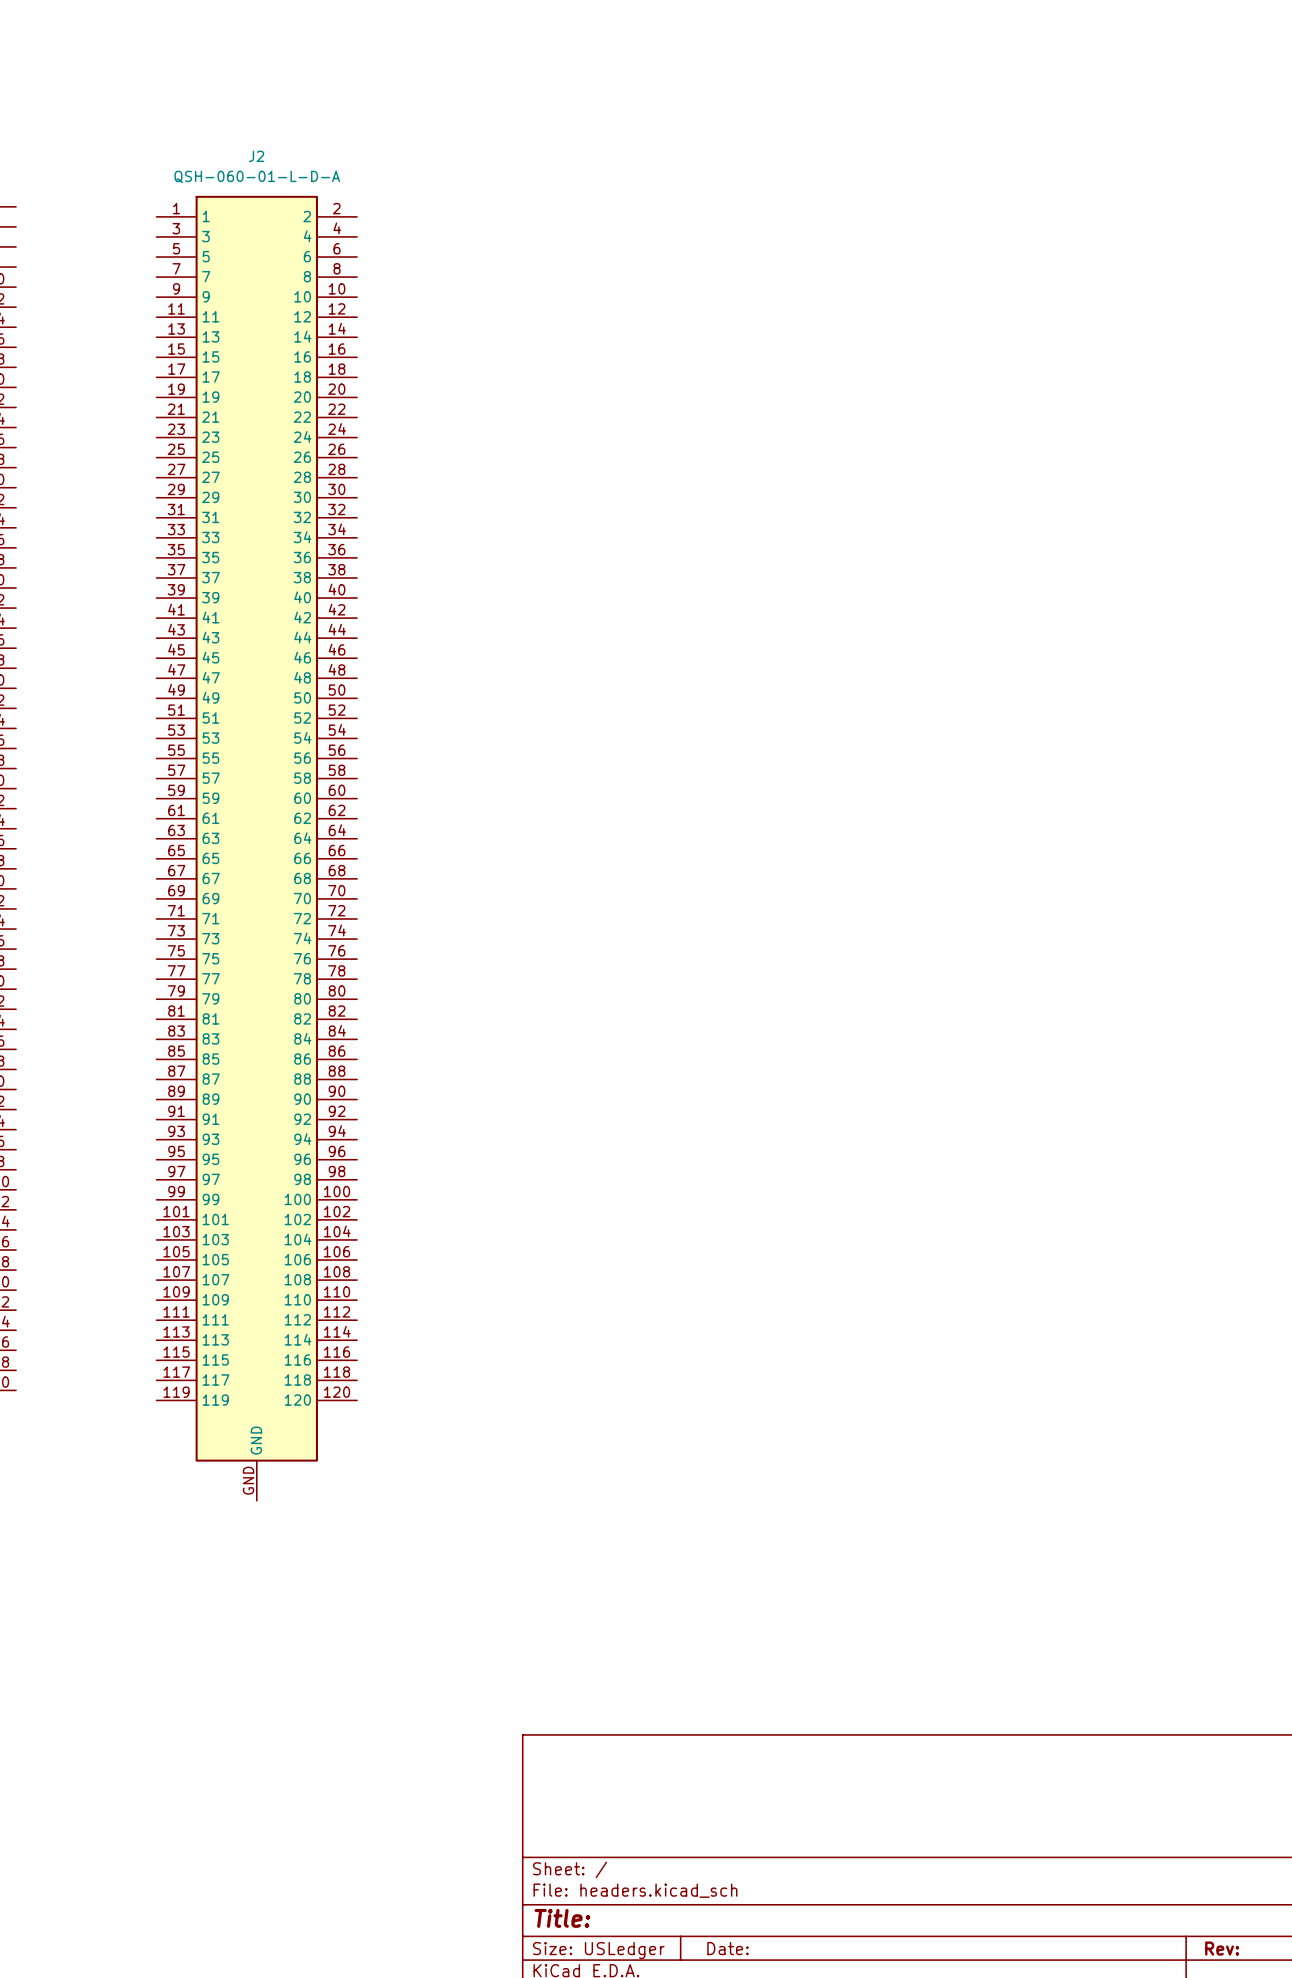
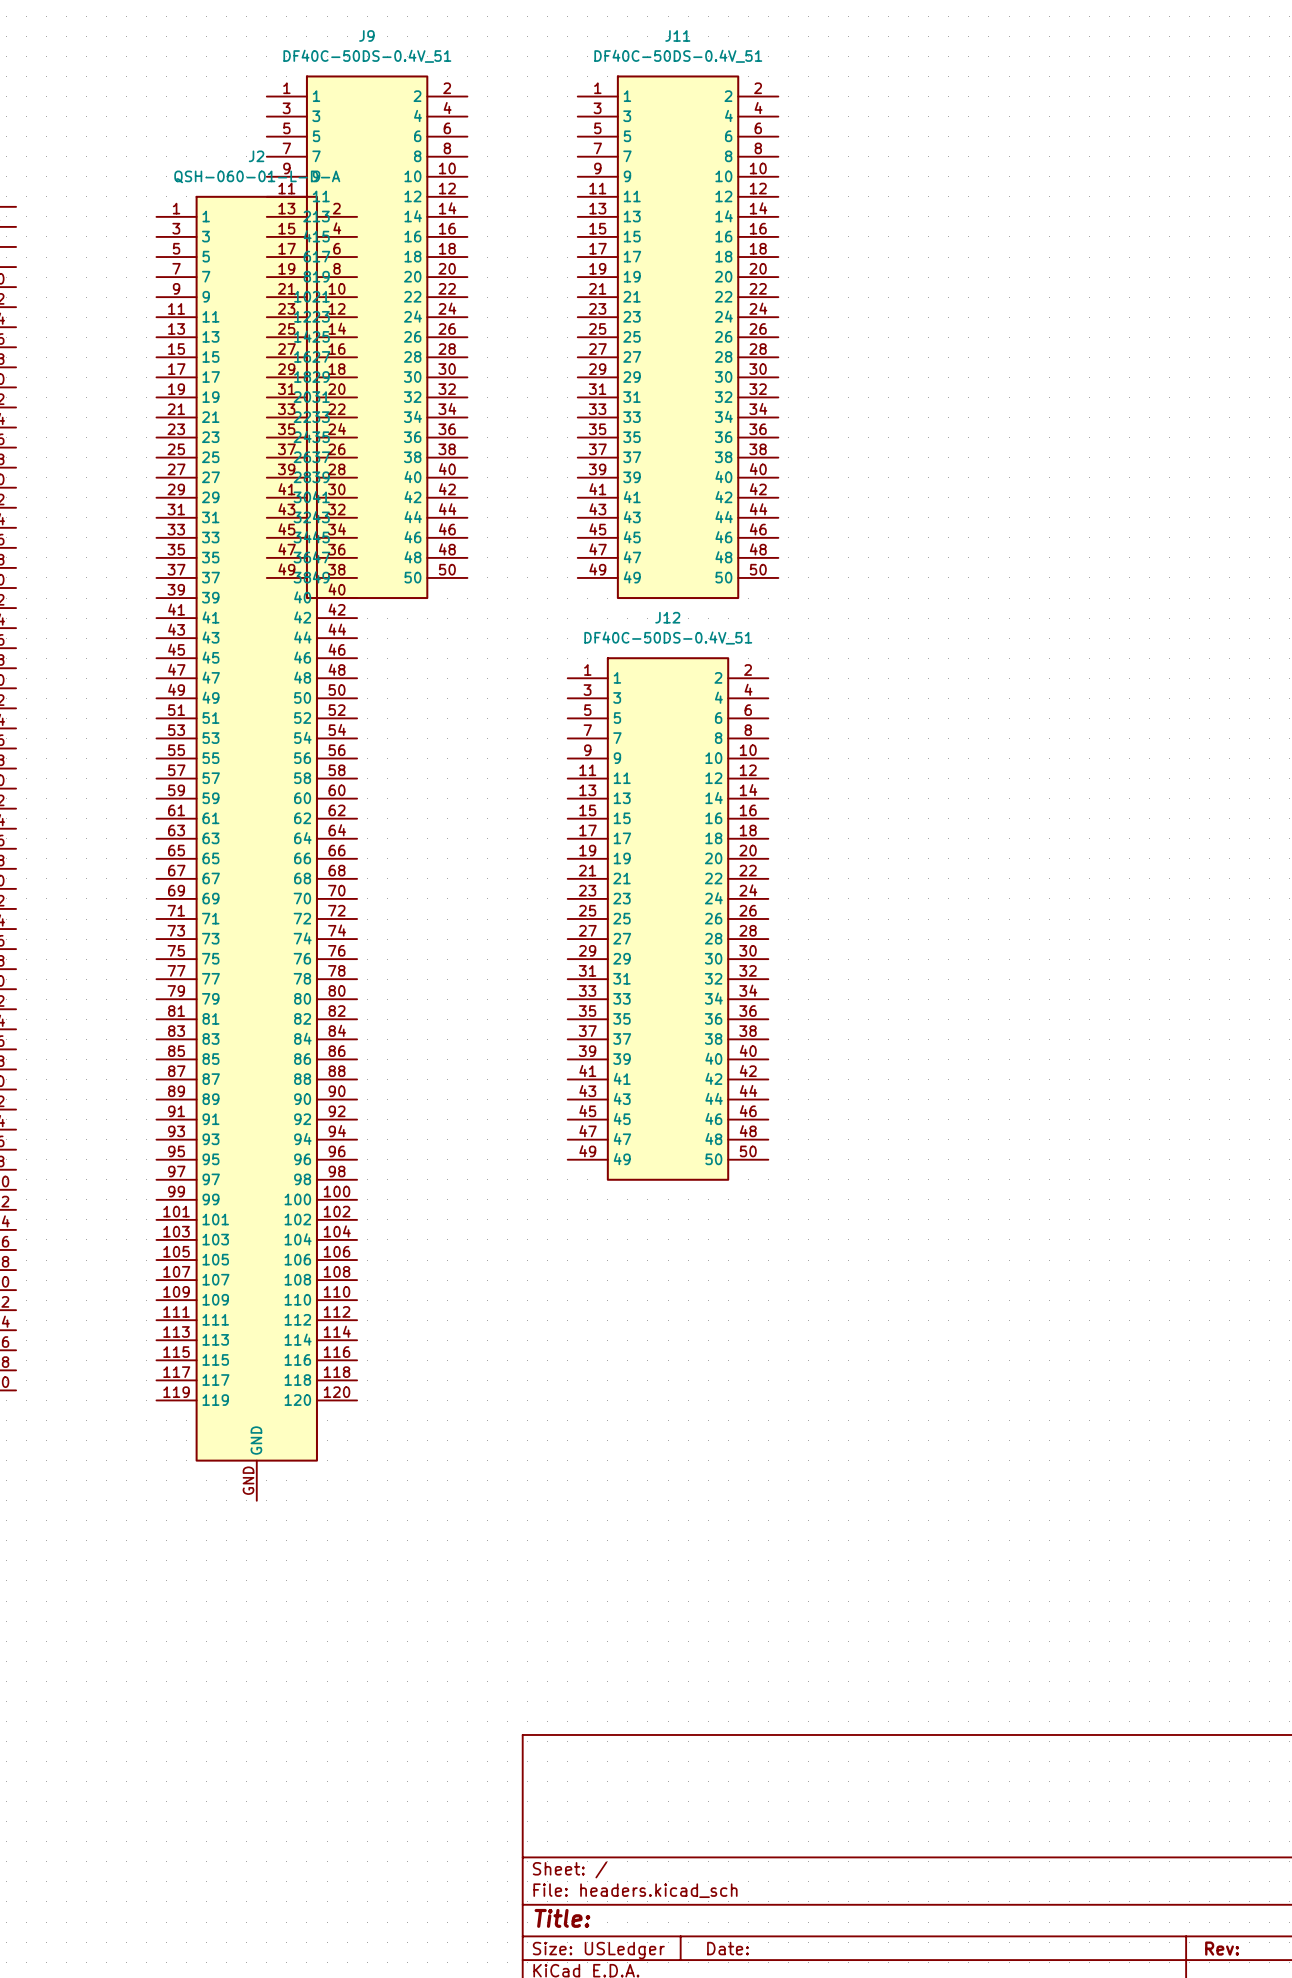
J9: none -> DF40C-50DS-0.4V_51 (367, 337)
J11: none -> DF40C-50DS-0.4V_51 (678, 337)
J12: none -> DF40C-50DS-0.4V_51 (668, 919)

